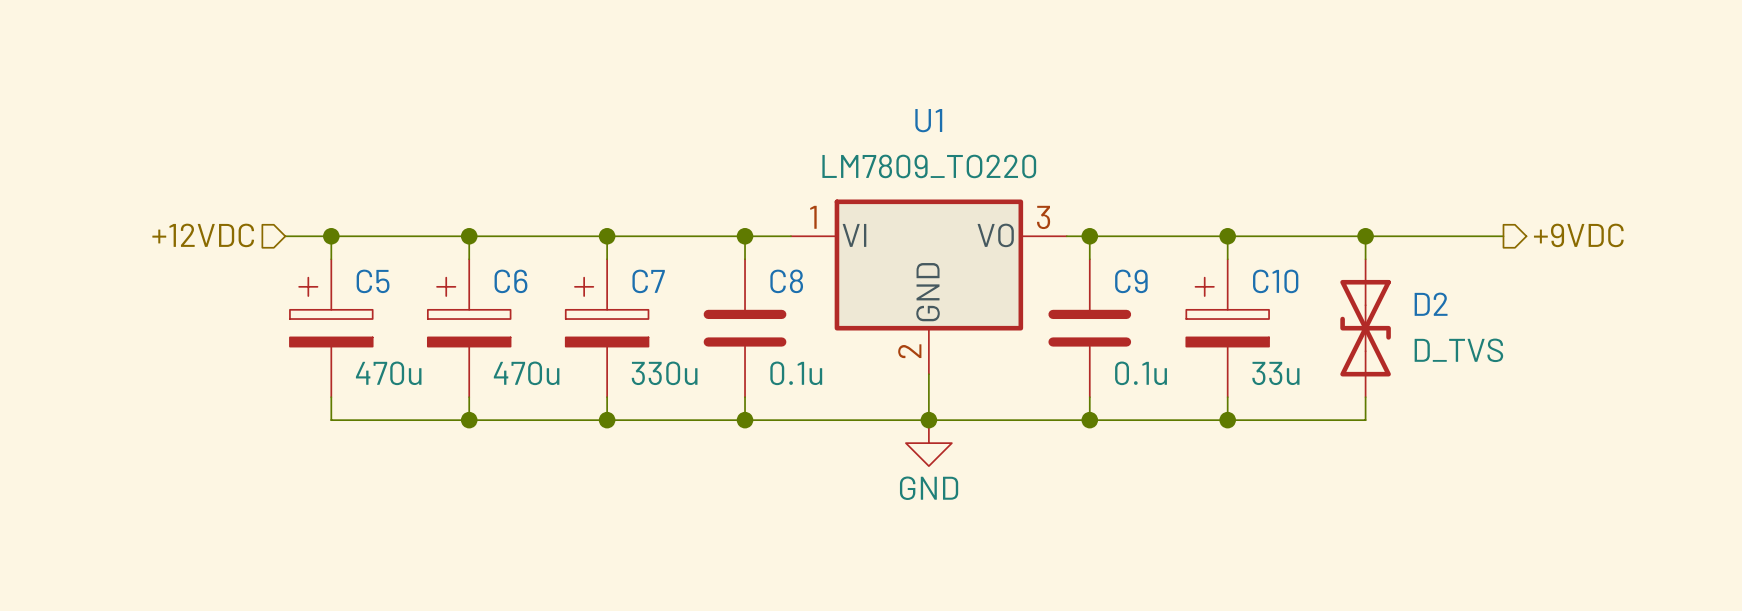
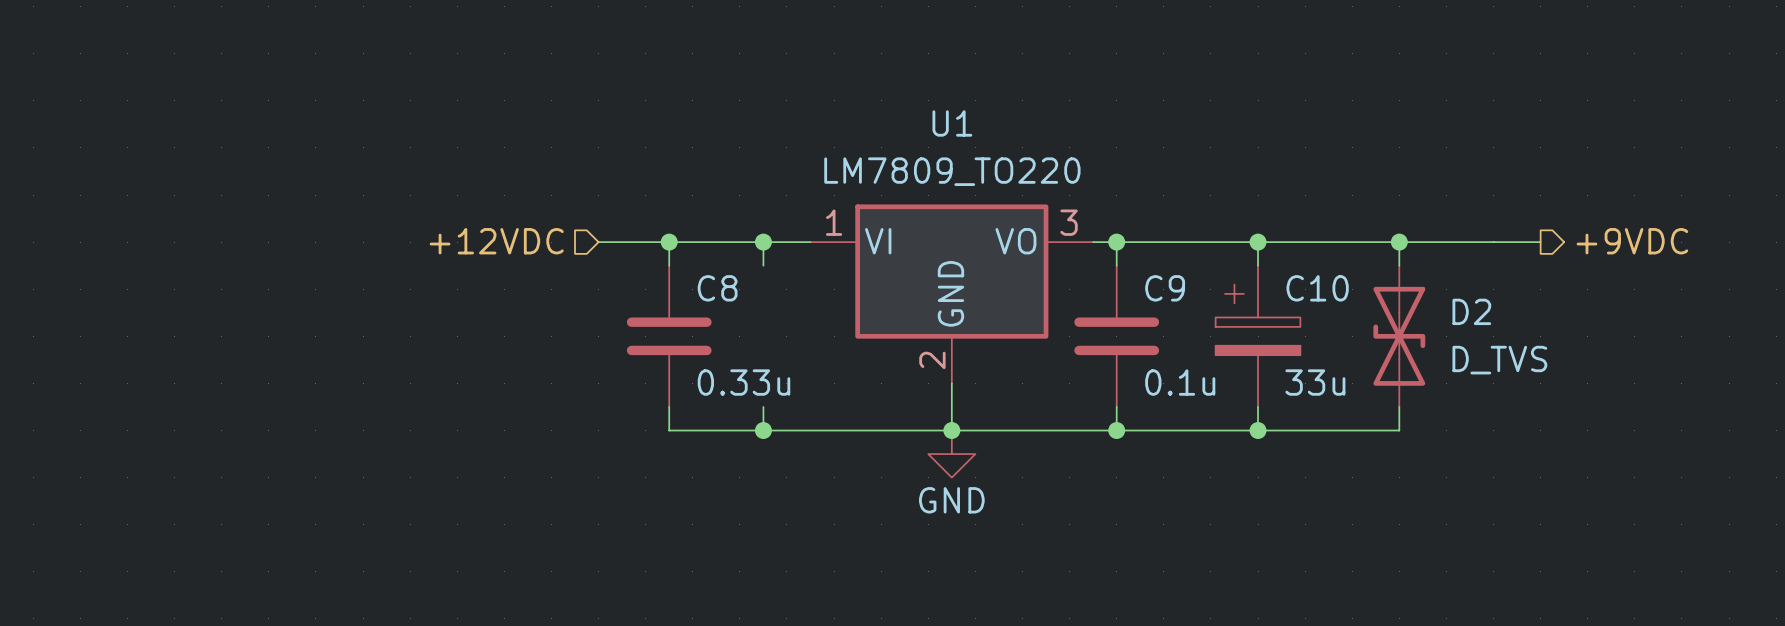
hierarchical label position: +12VDC (203, 235) -> +12VDC (496, 241)
wire: (285, 236) (584, 236) -> none
wire: (331, 236) (331, 259) -> none
junction: (331, 236) -> none
wire: (469, 236) (469, 259) -> none
junction: (469, 236) -> none
wire: (607, 236) (607, 259) -> (669, 242) (669, 265)
junction position: (607, 236) -> (669, 242)
C5: 470u (331, 328) -> none
C6: 470u (469, 328) -> none
C7: 330u (607, 328) -> none
C8 position: (745, 328) -> (669, 336)
C8 value: 0.1u (796, 373) -> 0.33u (743, 382)
wire: (331, 397) (331, 420) (653, 420) -> (669, 406) (669, 430)
wire: (469, 397) (469, 420) -> none
wire: (607, 397) (607, 420) -> none
junction: (469, 420) -> none
junction: (607, 420) -> none

